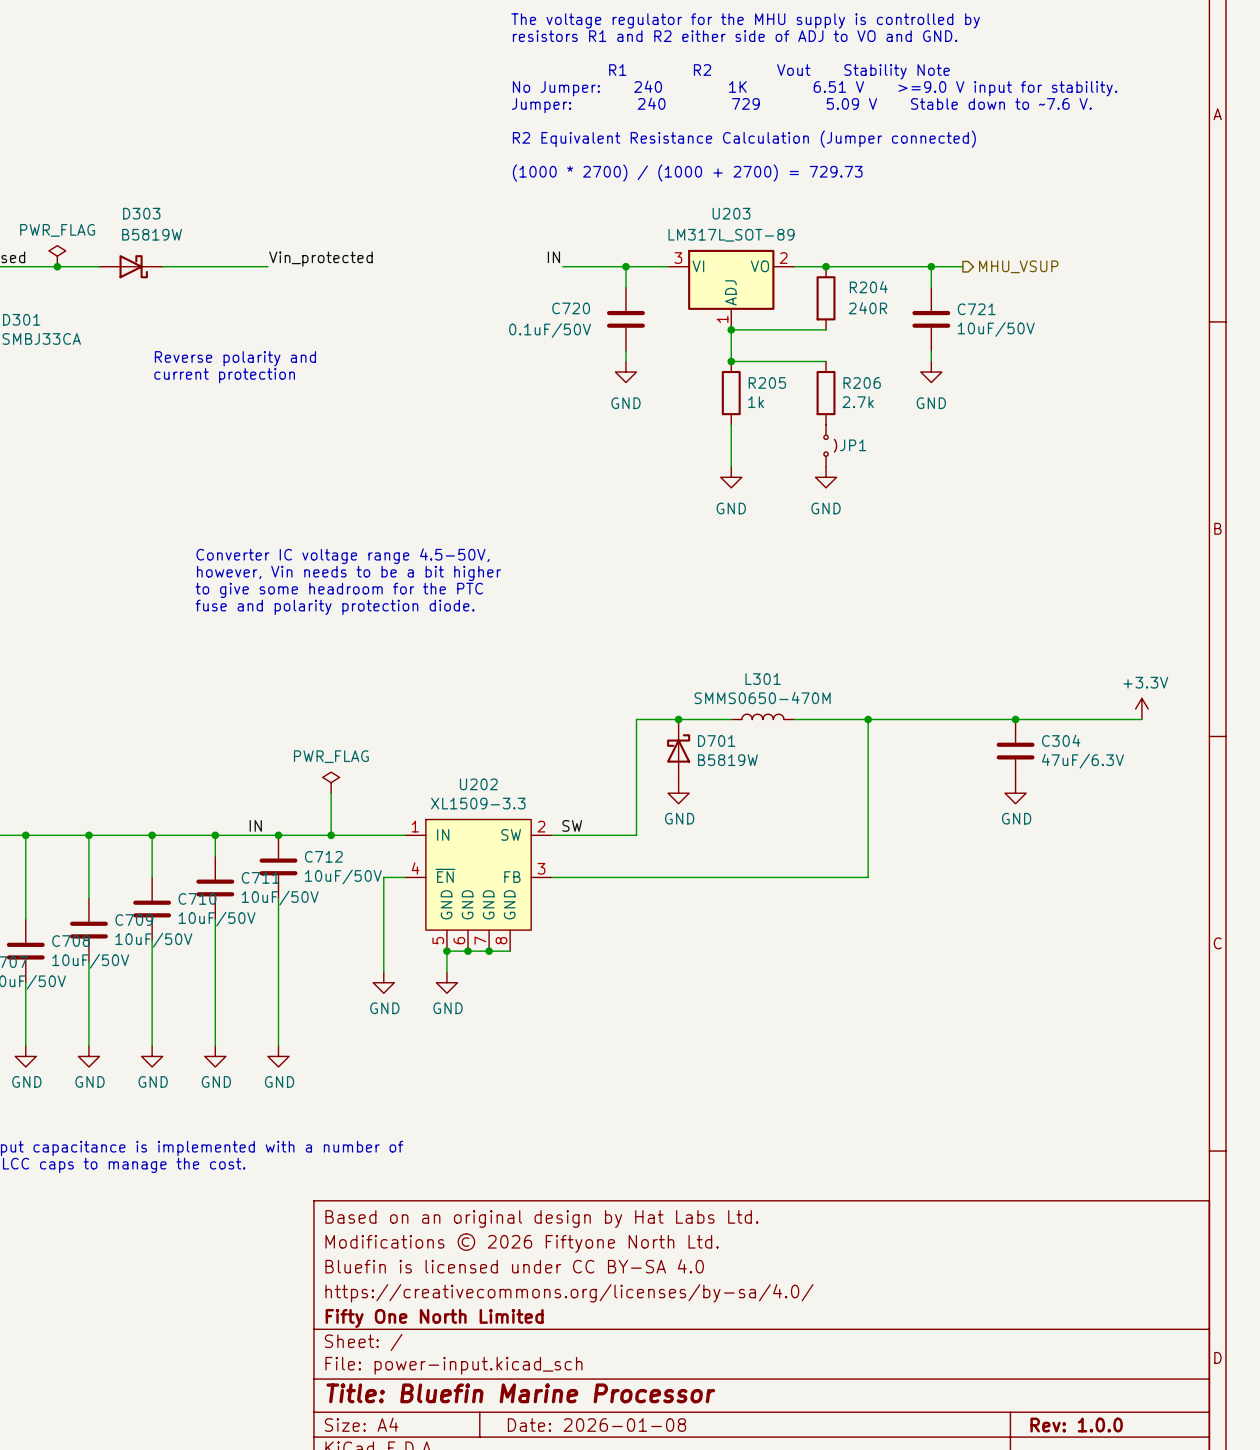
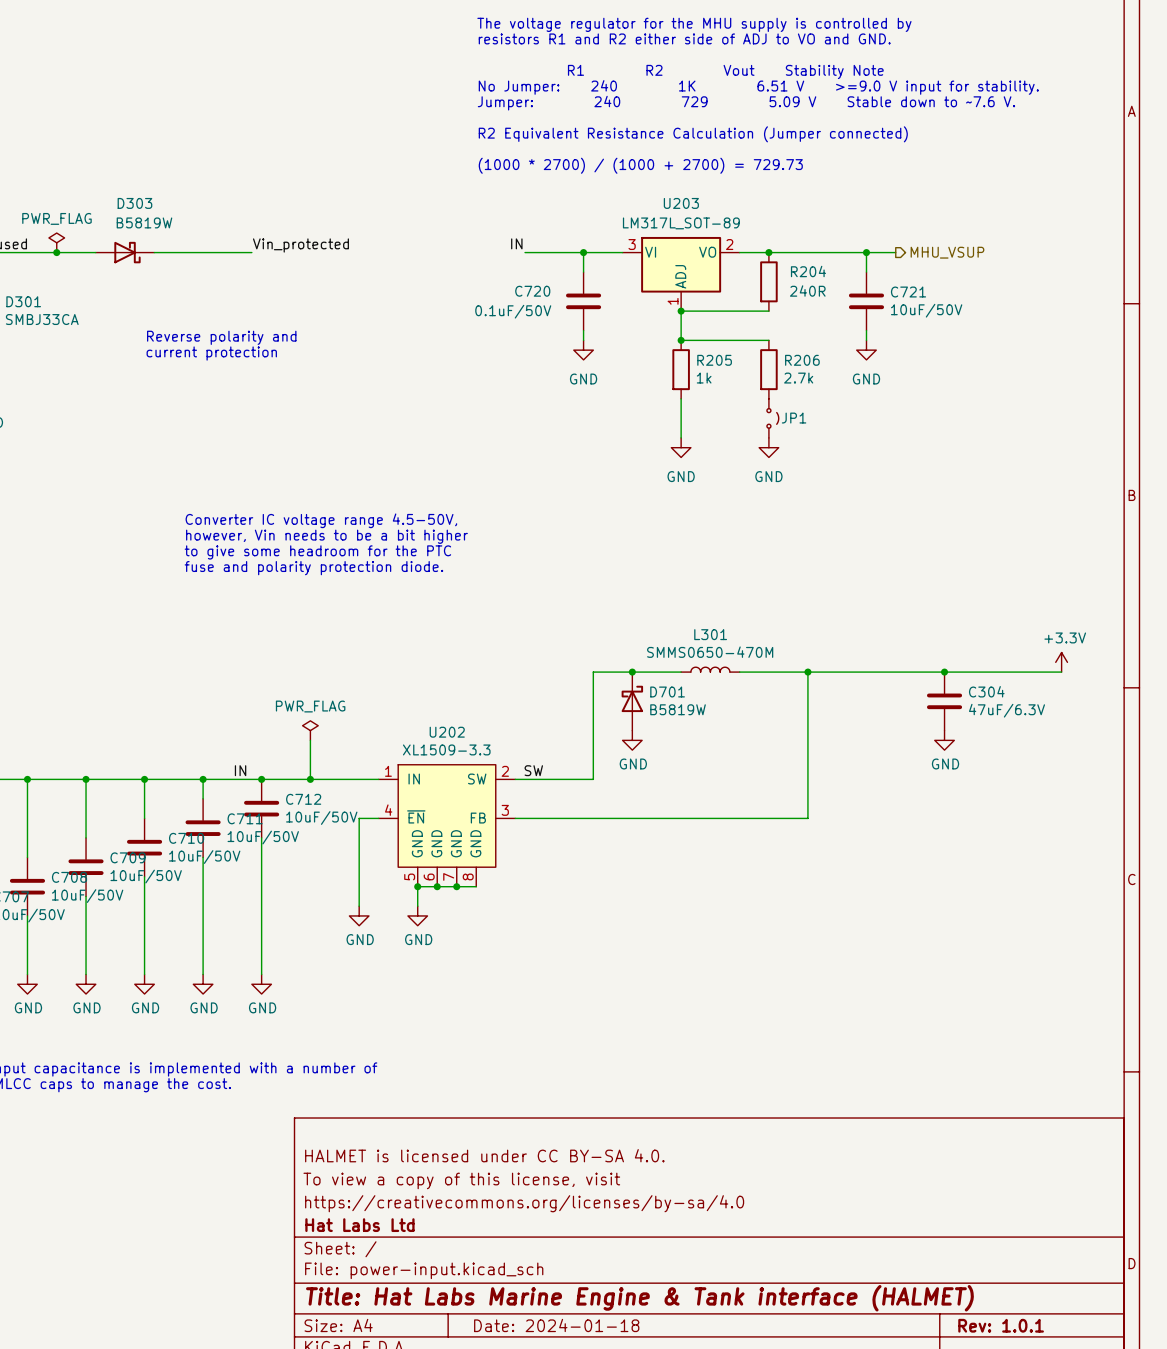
title block: Based on an original design by Hat Labs Ltd. (541, 1218) -> none
title block: Modifications © 2026 Fiftyone North Ltd. (522, 1242) -> HALMET is licensed under CC BY-SA 4.0. (484, 1155)
title block: Bluefin is licensed under CC BY-SA 4.0 (514, 1266) -> To view a copy of this license, visit (461, 1180)
title block: https://creativecommons.org/licenses/by-sa/4.0/ (569, 1293) -> https://creativecommons.org/licenses/by-sa/4.0 (524, 1203)
title block: Fifty One North Limited (434, 1318) -> Hat Labs Ltd (359, 1225)
title block: Title: Bluefin Marine Processor (520, 1393) -> Title: Hat Labs Marine Engine & Tank interface (HALMET) (639, 1298)
title block: Date: 2026-01-08 (596, 1425) -> Date: 2024-01-18 (556, 1325)
title block: Rev: 1.0.0 (1076, 1425) -> Rev: 1.0.1 (1001, 1325)

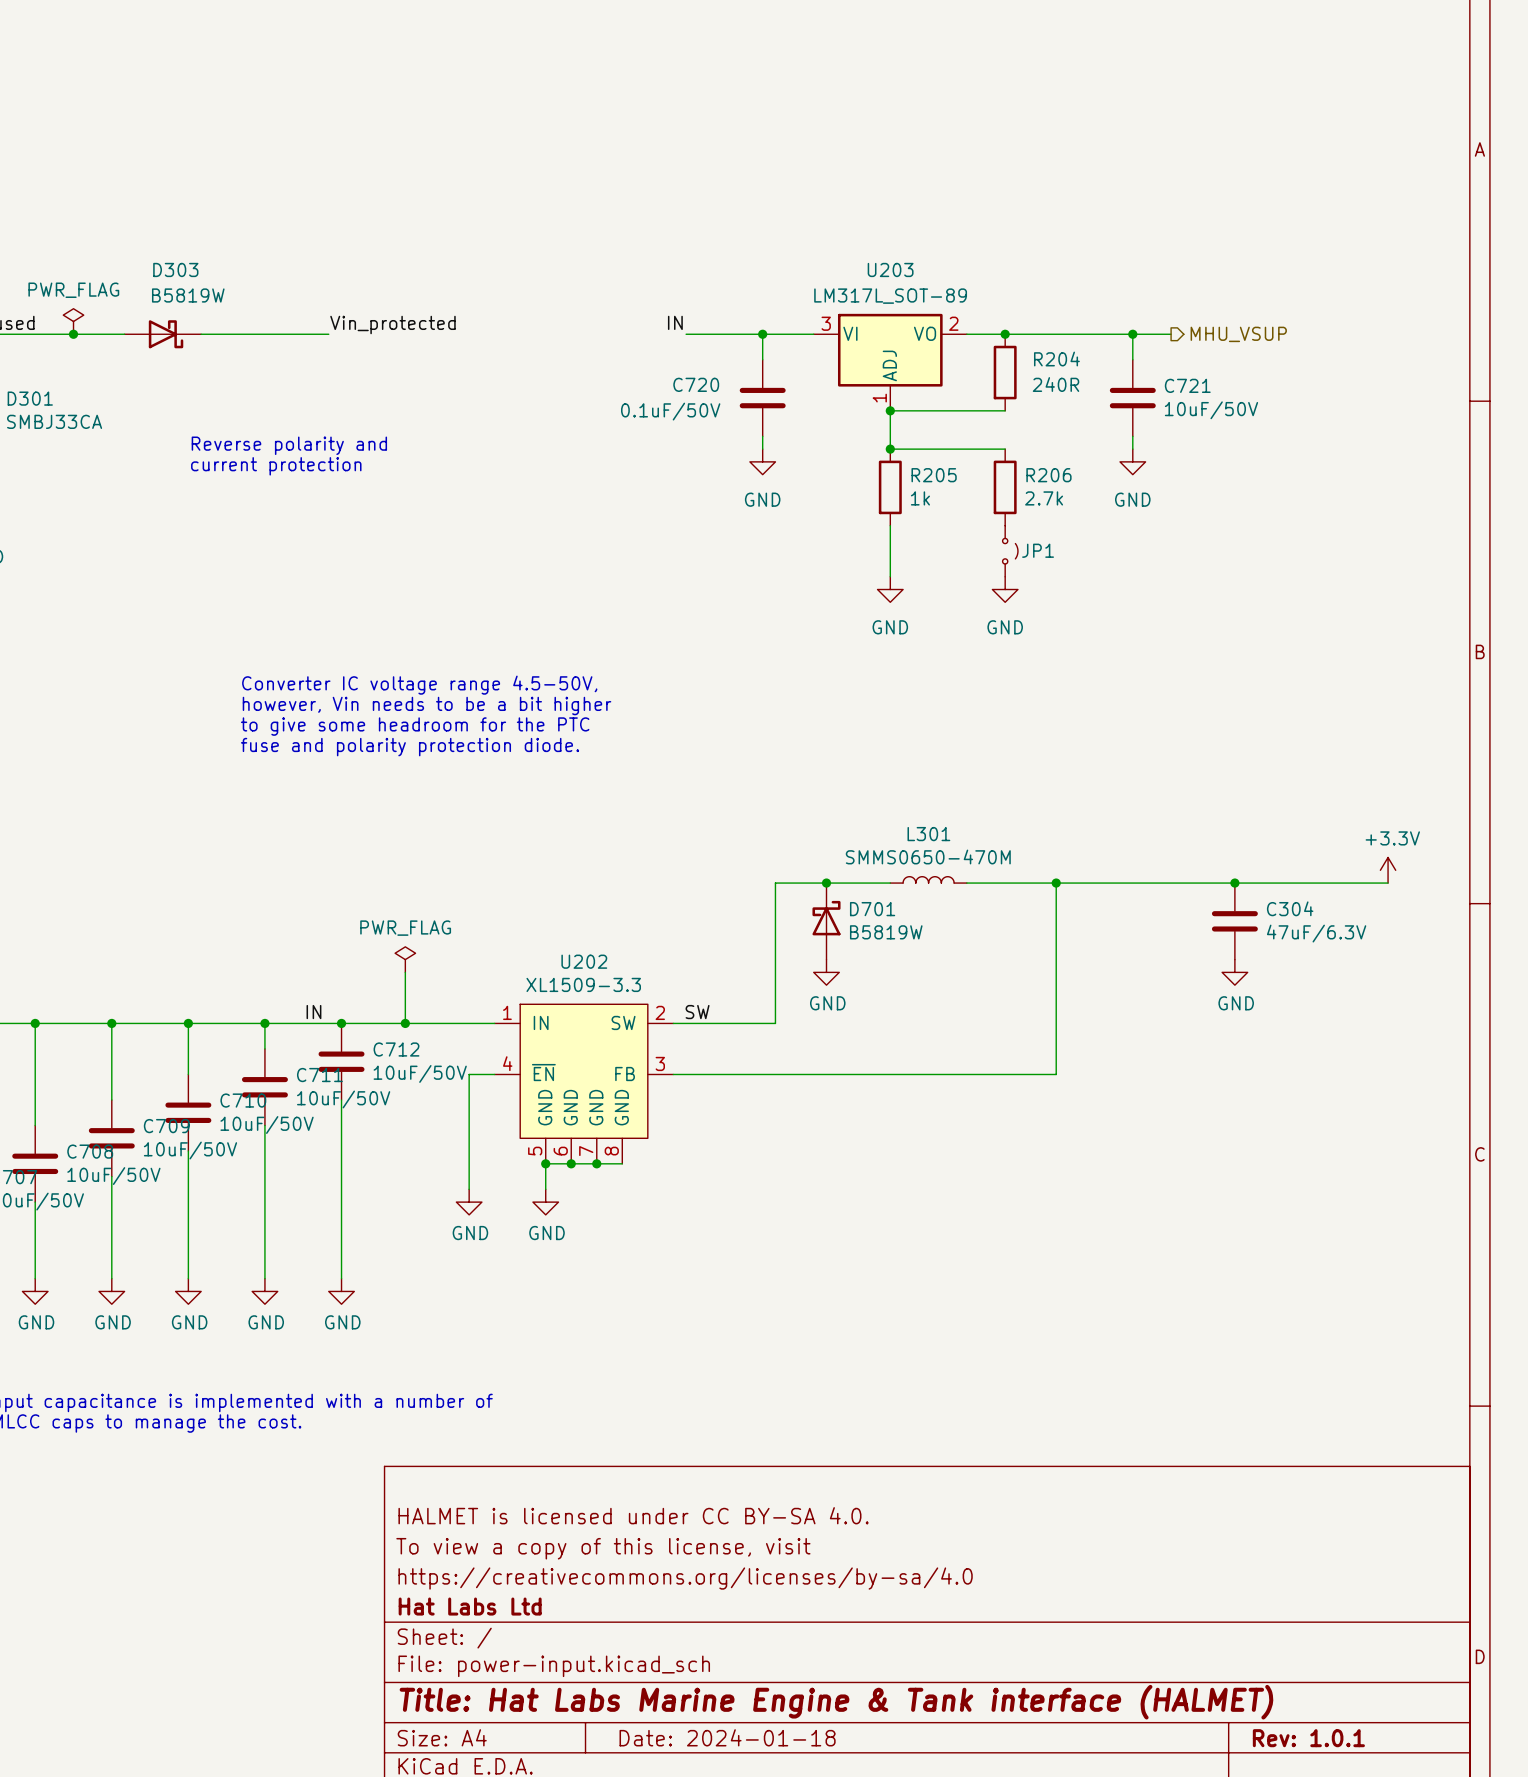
text: The voltage regulator for the MHU supply is controlled by (694, 24) -> none
text: resistors R1 and R2 either side of ADJ to VO and GND. (684, 38) -> none
text: R1 R2 Vout Stability Note (725, 71) -> none
text: No Jumper: 240 1K 6.51 V >=9.0 V input for stability. (758, 87) -> none
text: Jumper: 240 729 5.09 V Stable down to ~7.6 V. (746, 103) -> none
text: R2 Equivalent Resistance Calculation (Jumper connected) (693, 134) -> none
text: (1000 * 2700) / (1000 + 2700) = 729.73 (640, 165) -> none

